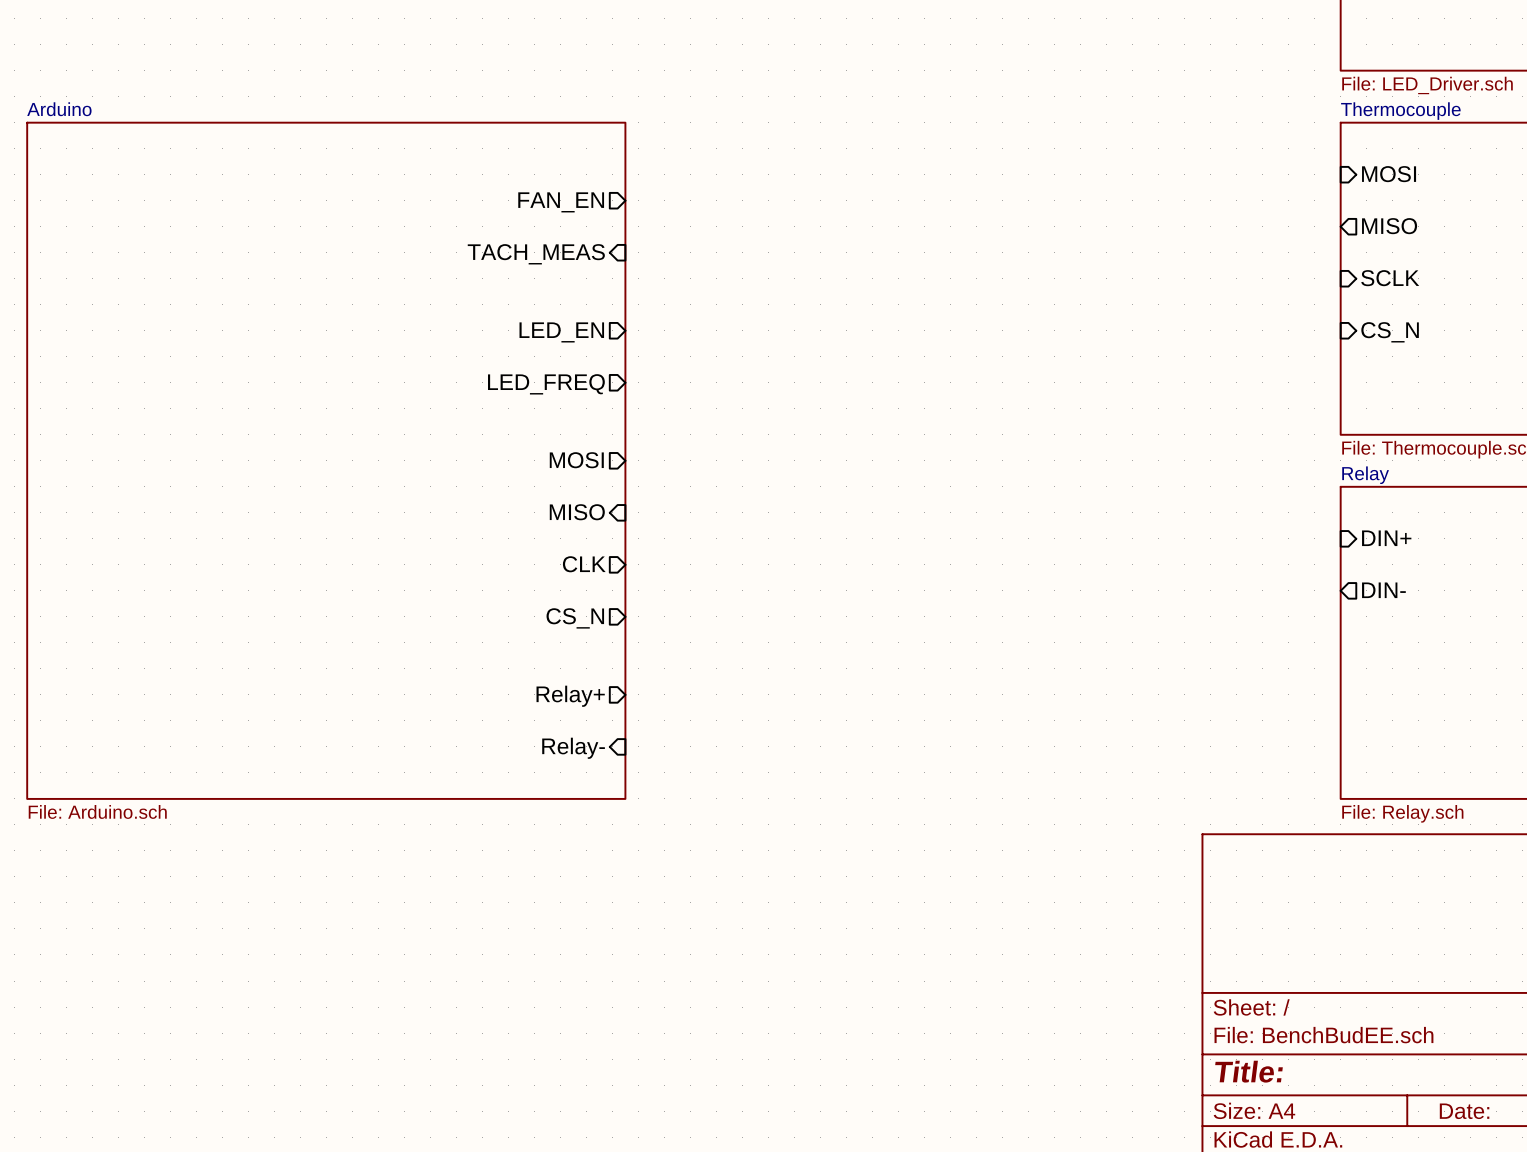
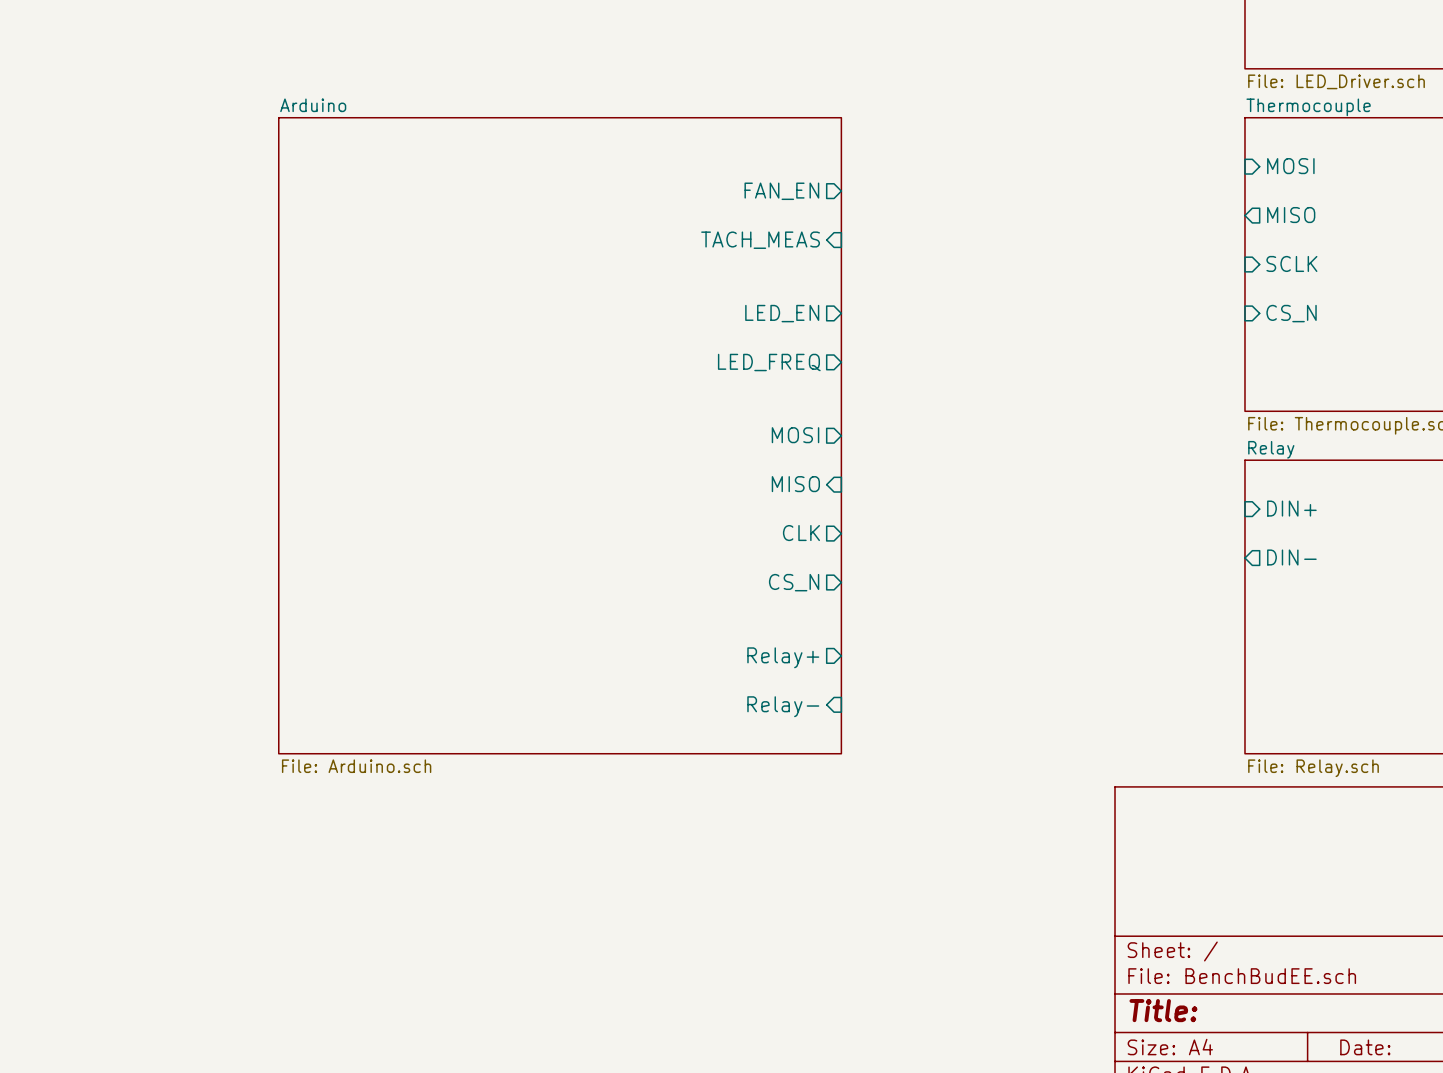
sheet pin: FAN_EN (561, 202) -> none
sheet pin: none -> FAN_EN (781, 191)
sheet pin: TACH_MEAS (536, 254) -> none
sheet pin: none -> TACH_MEAS (760, 240)
sheet pin: LED_EN (561, 332) -> none
sheet pin: none -> LED_EN (782, 313)
sheet pin: LED_FREQ (546, 384) -> none
sheet pin: none -> LED_FREQ (769, 362)
sheet Arduino: File: Arduino.sch (326, 460) -> none
sheet pin: MOSI (576, 460) -> none
sheet Arduino: none -> File: Arduino.sch (560, 435)
sheet pin: none -> MOSI (795, 435)
sheet pin: MISO (577, 512) -> none
sheet pin: none -> MISO (795, 484)
sheet pin: CLK (584, 564) -> none
sheet pin: none -> CLK (801, 533)
sheet pin: CS_N (575, 618) -> none
sheet pin: none -> CS_N (794, 582)
sheet pin: Relay+ (570, 696) -> none
sheet pin: none -> Relay+ (783, 657)
sheet pin: Relay- (573, 748) -> none
sheet pin: none -> Relay- (783, 706)

